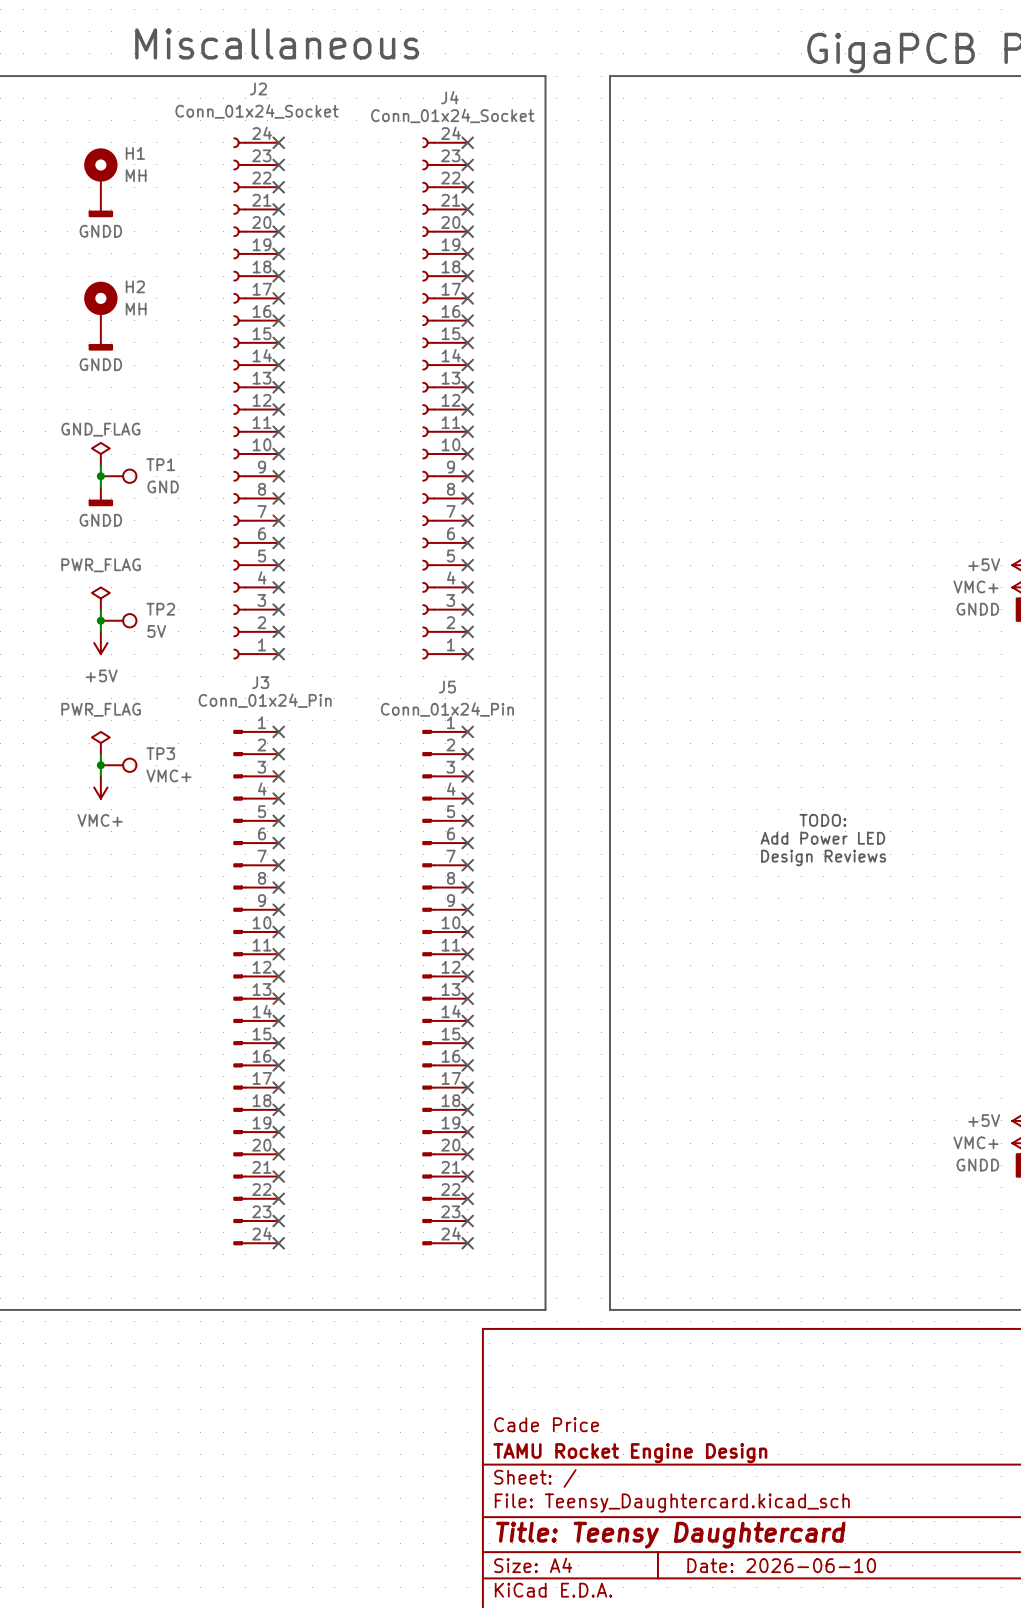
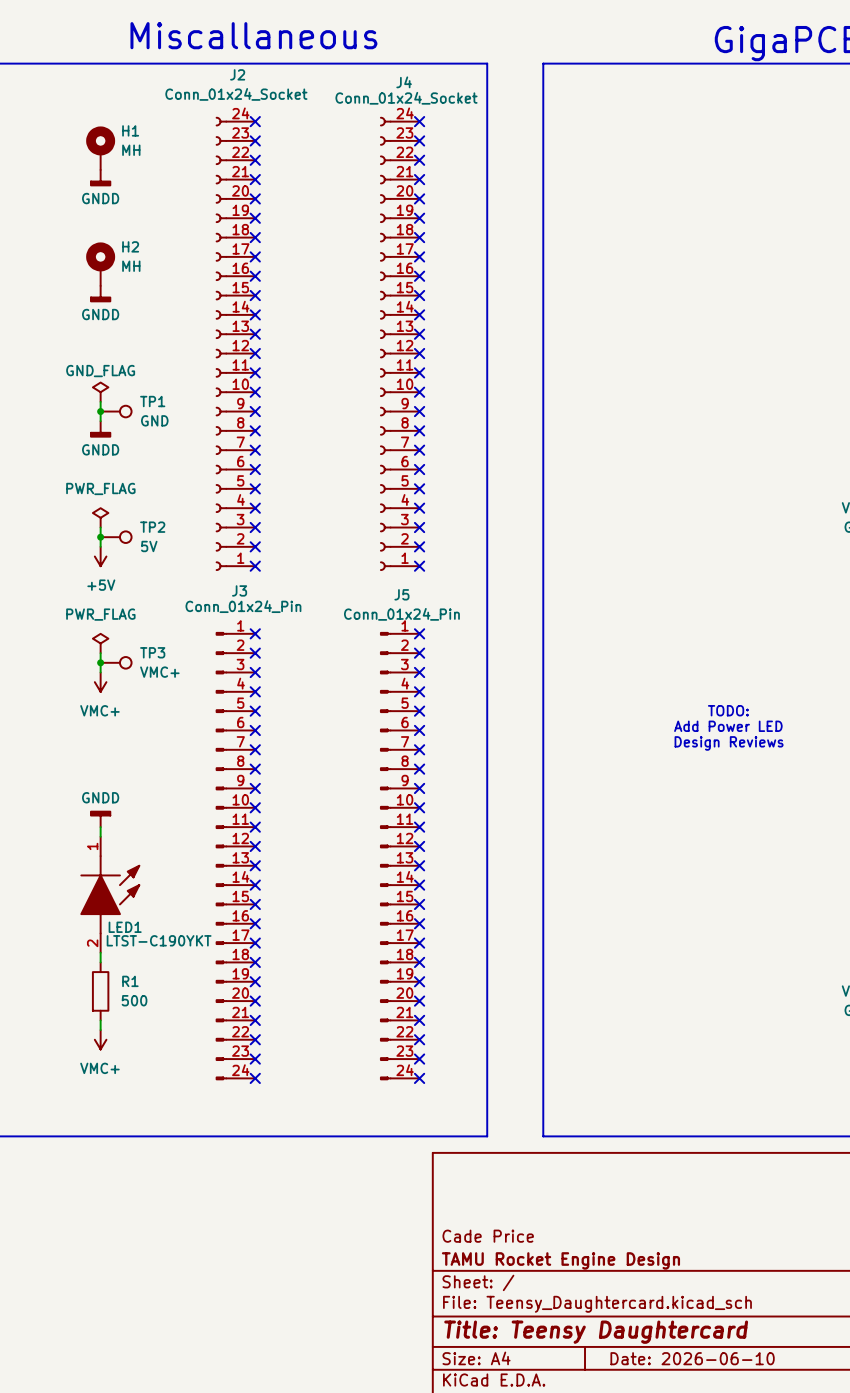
power symbol: none -> GNDD (100, 818)
wire: none -> (100, 827) (100, 836)
LED1: none -> LTST-C190YKT (110, 894)
wire: none -> (100, 952) (100, 962)
R1: none -> 500 (100, 991)
wire: none -> (100, 1020) (100, 1030)
power symbol: none -> VMC+ (100, 1039)

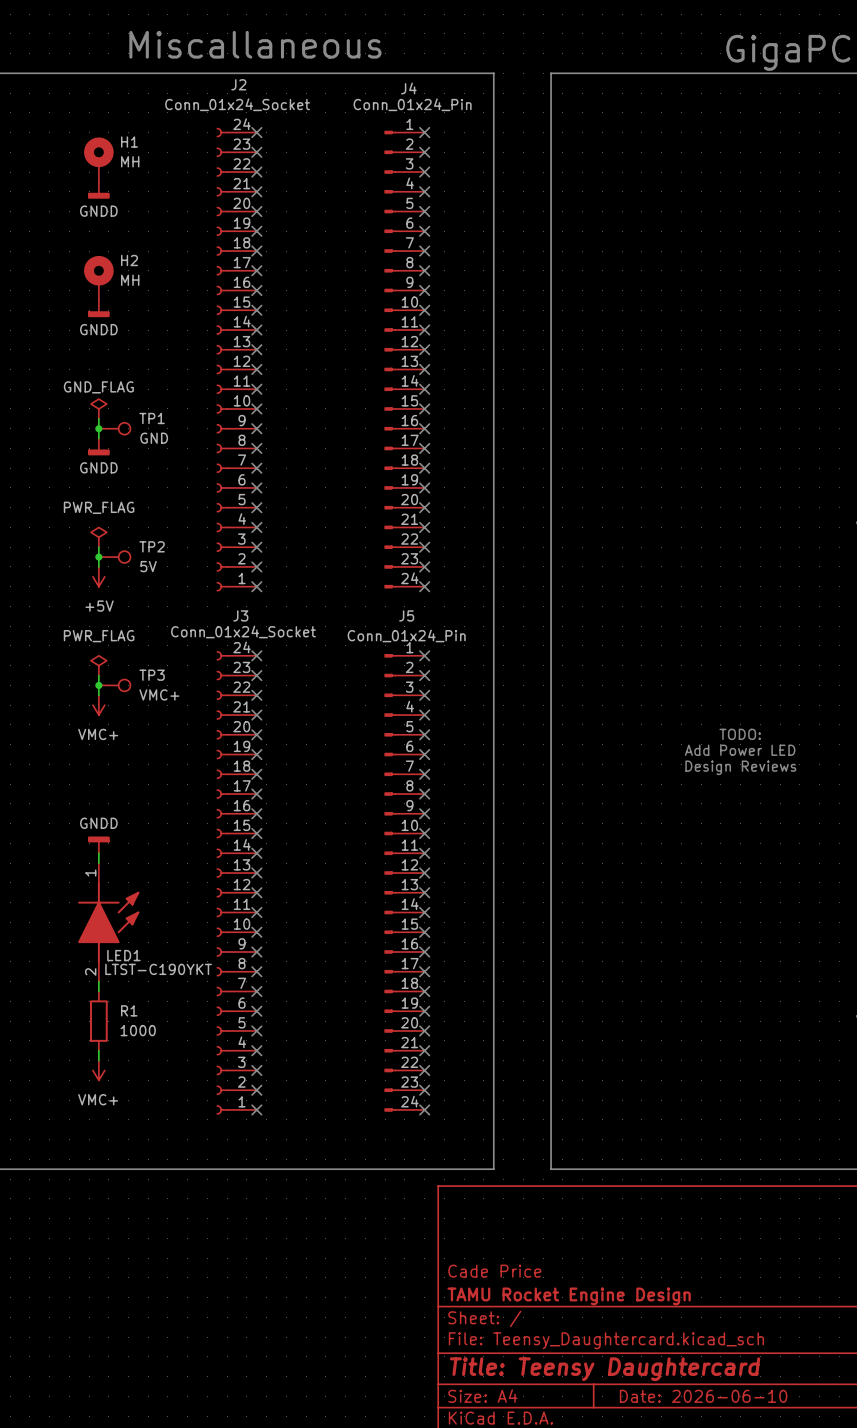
J4 value: Conn_01x24_Socket (406, 98) -> Conn_01x24_Pin (412, 104)
J4 symbol: [380, 117, 420, 571] -> [384, 130, 425, 589]
J3 value: Conn_01x24_Pin (243, 606) -> Conn_01x24_Socket (243, 631)
J3 symbol: [216, 632, 256, 1080] -> [216, 651, 257, 1115]
R1 value: 500 (134, 1000) -> 1000 (138, 1030)

